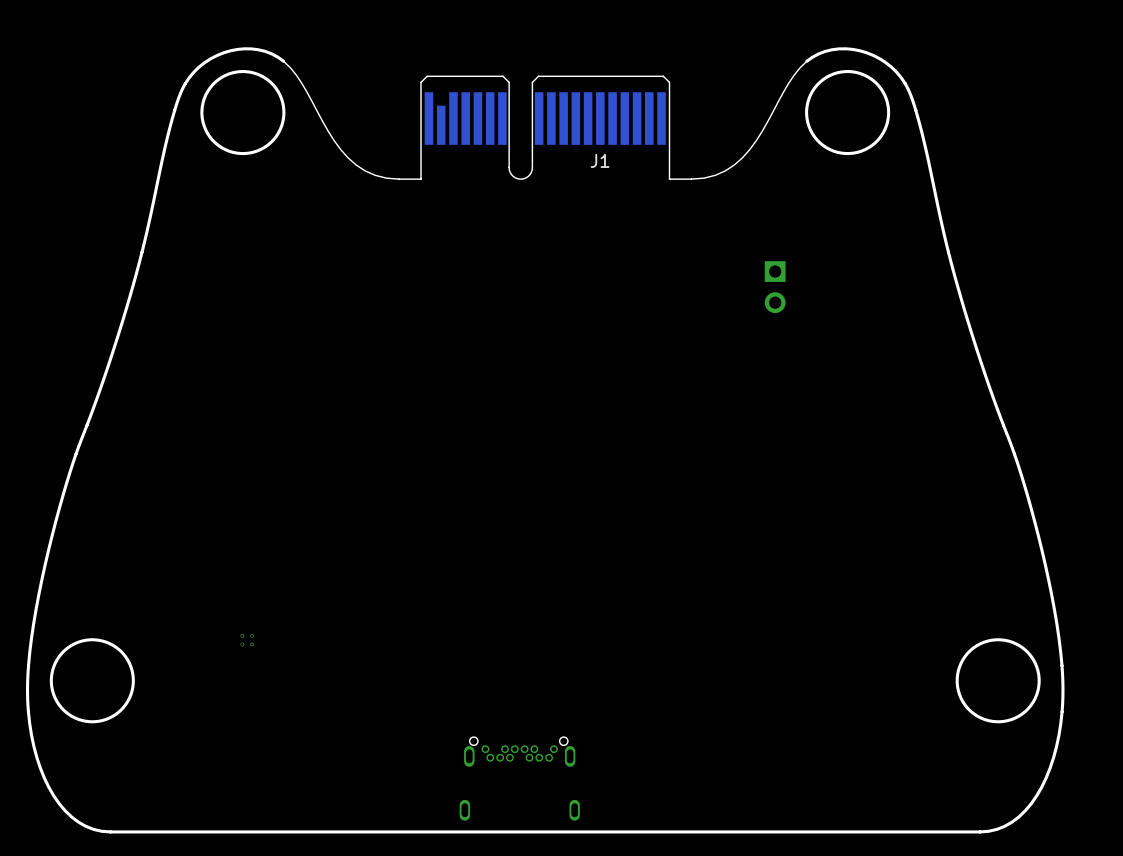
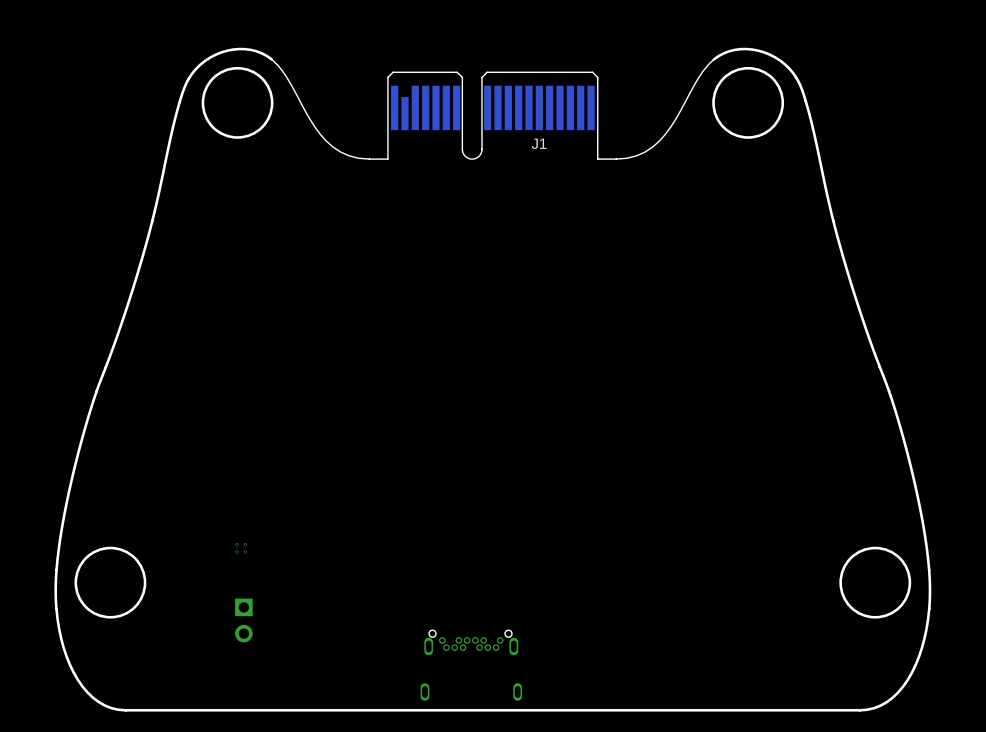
part: (775, 287) -> none
part: none -> (243, 620)

